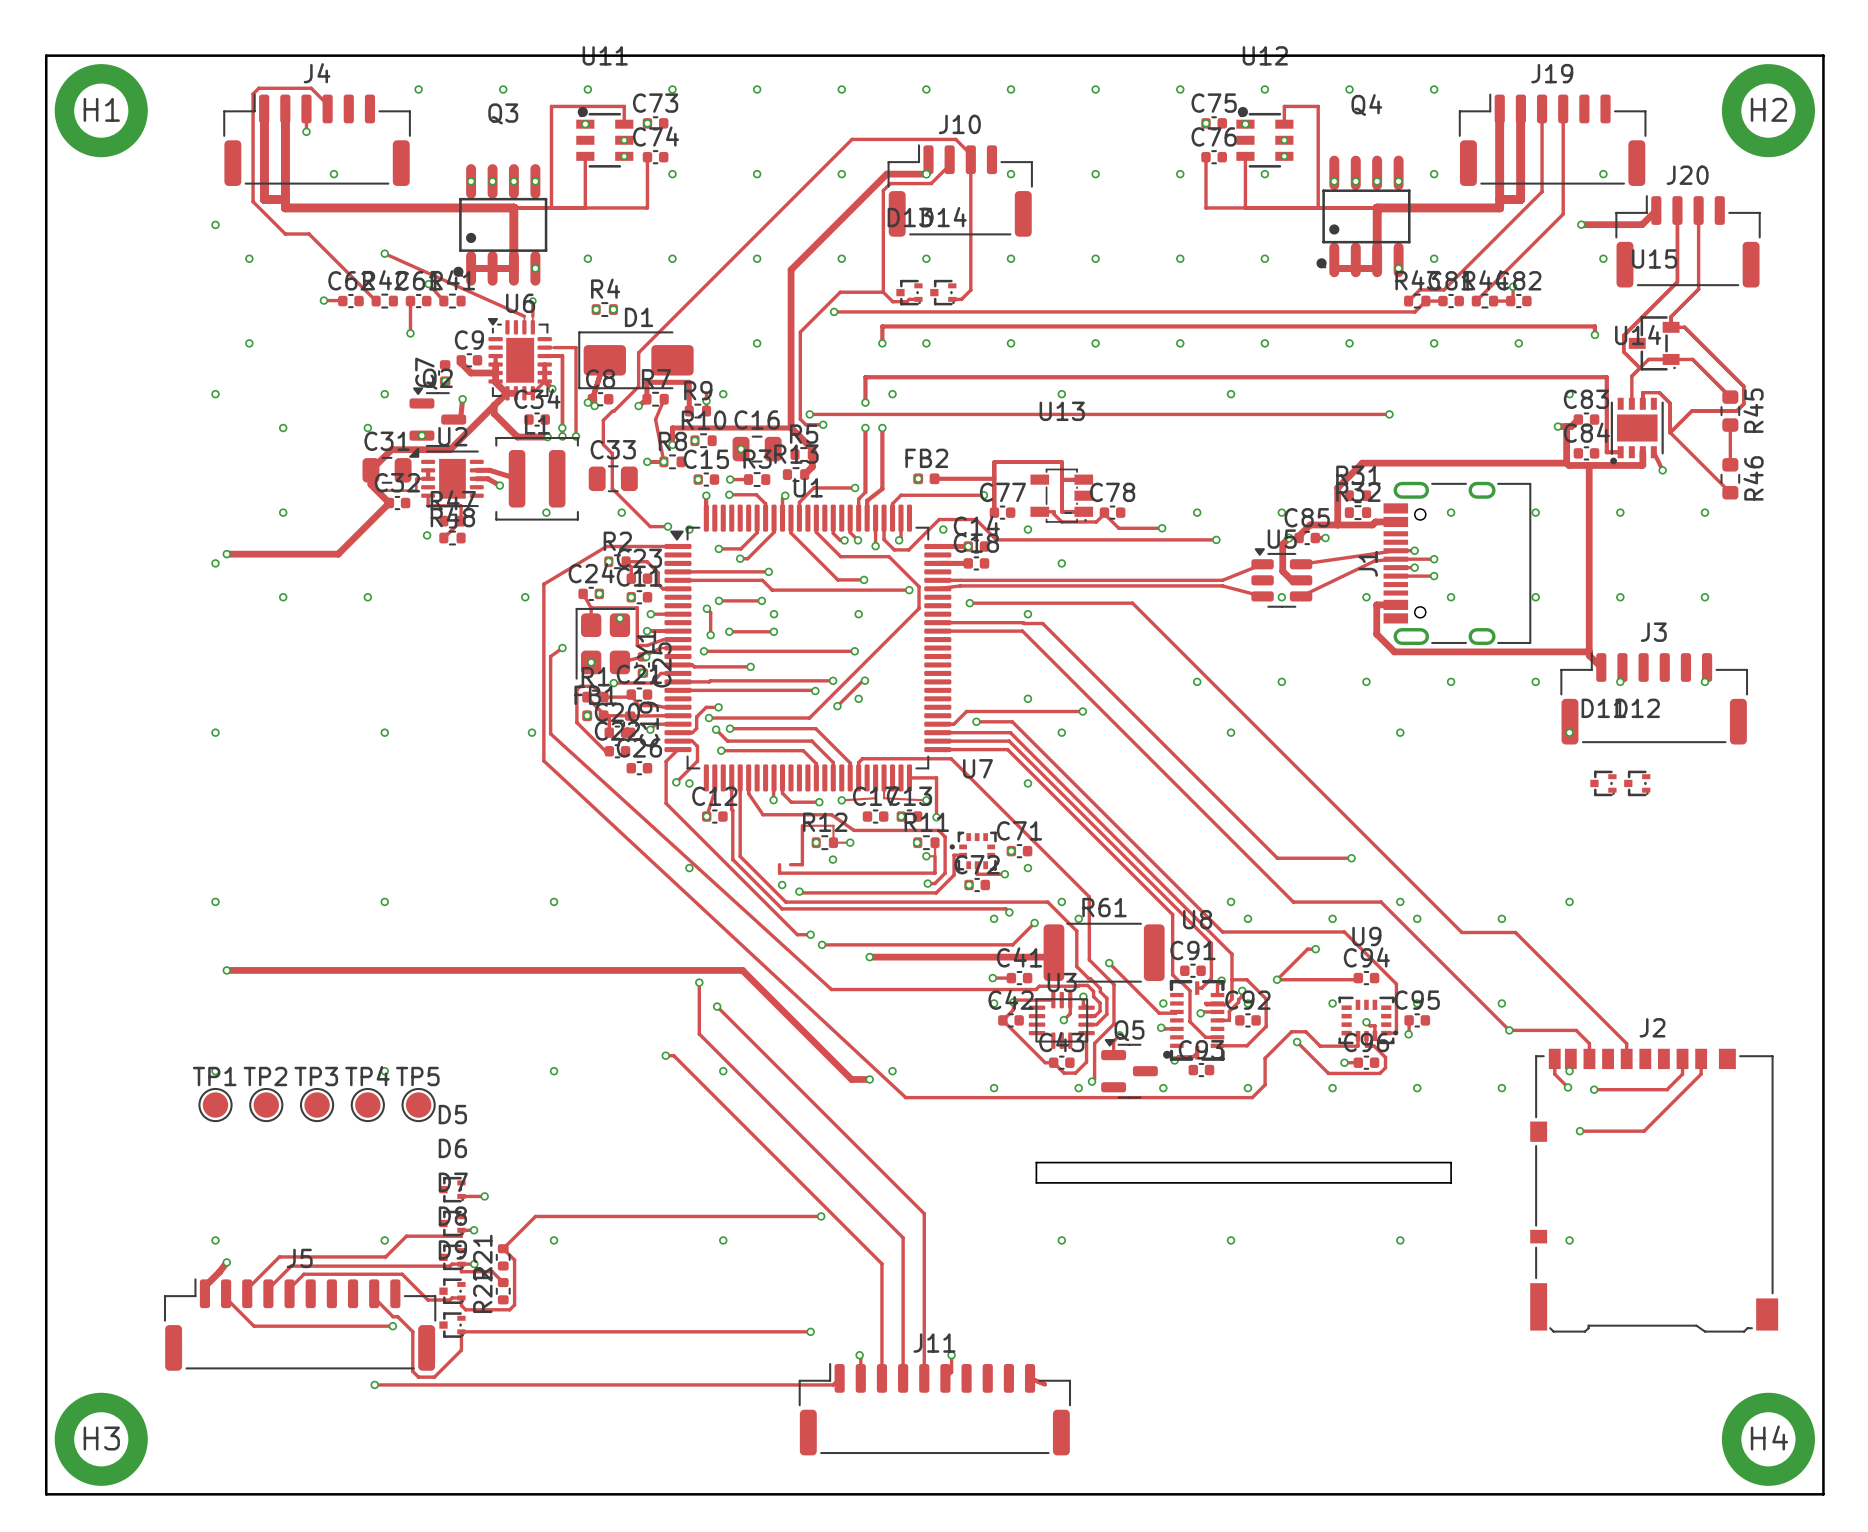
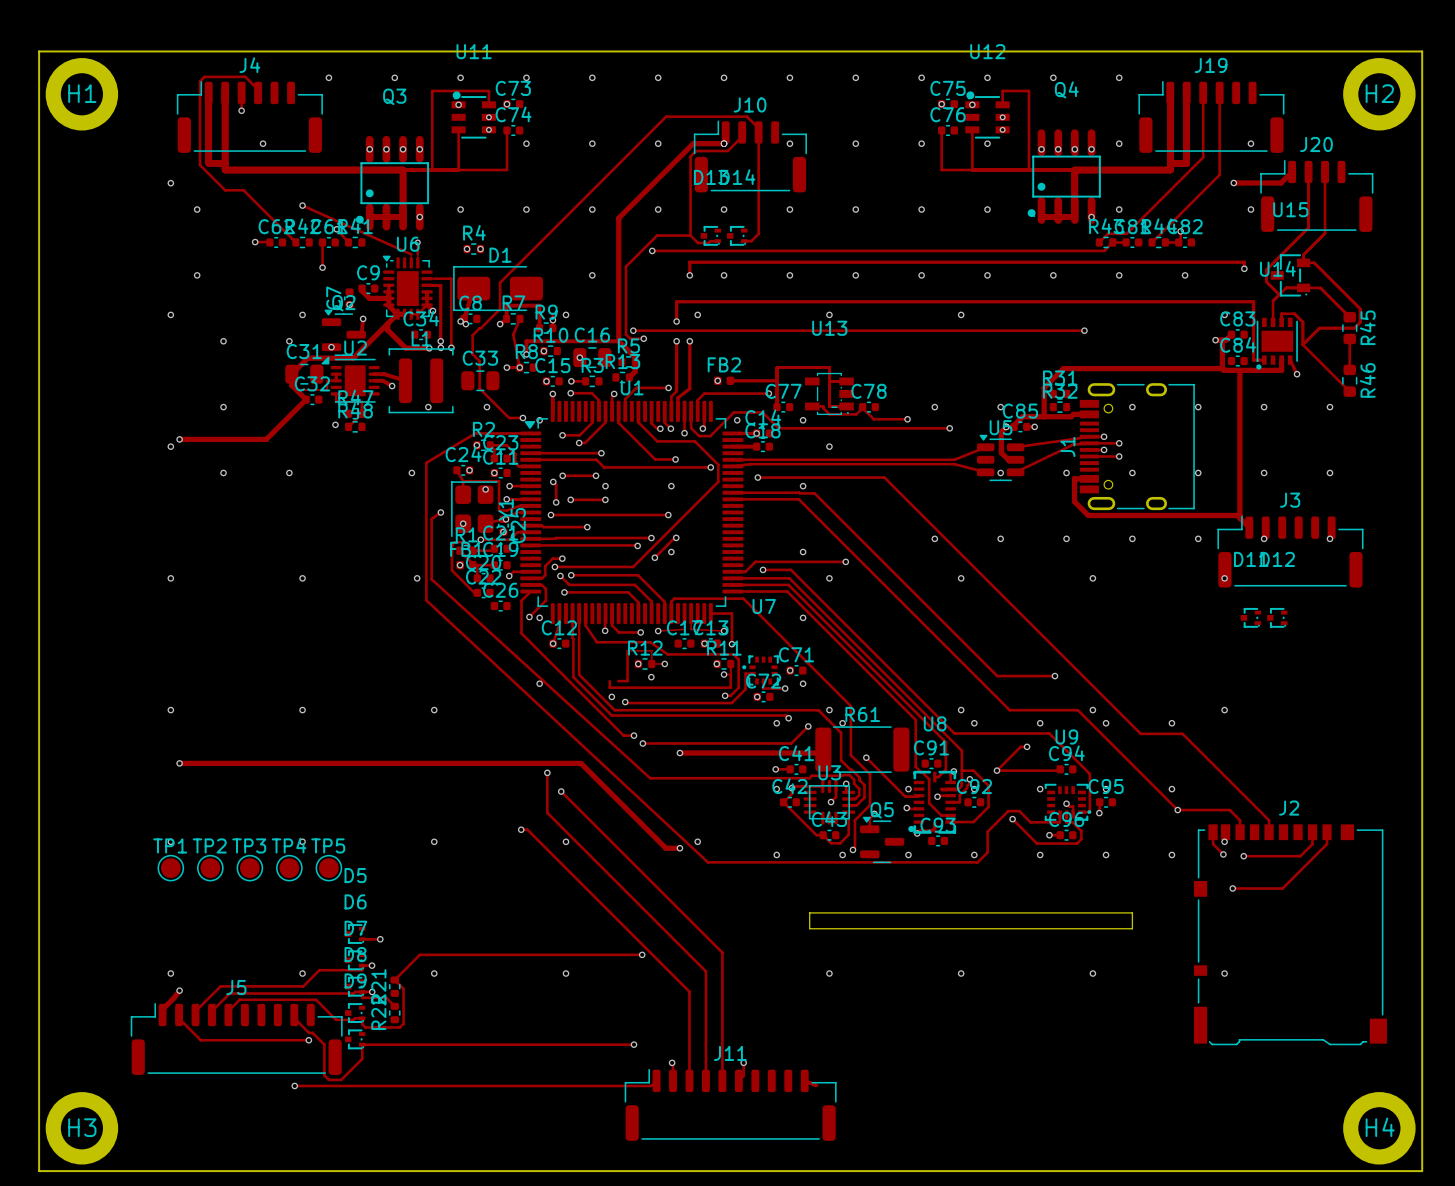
track: (631, 694) (638, 705) (664, 707) -> none
track: (664, 715) (630, 716) -> none
C19 rotation: 0° (630, 724) -> 90° clockwise (500, 565)

